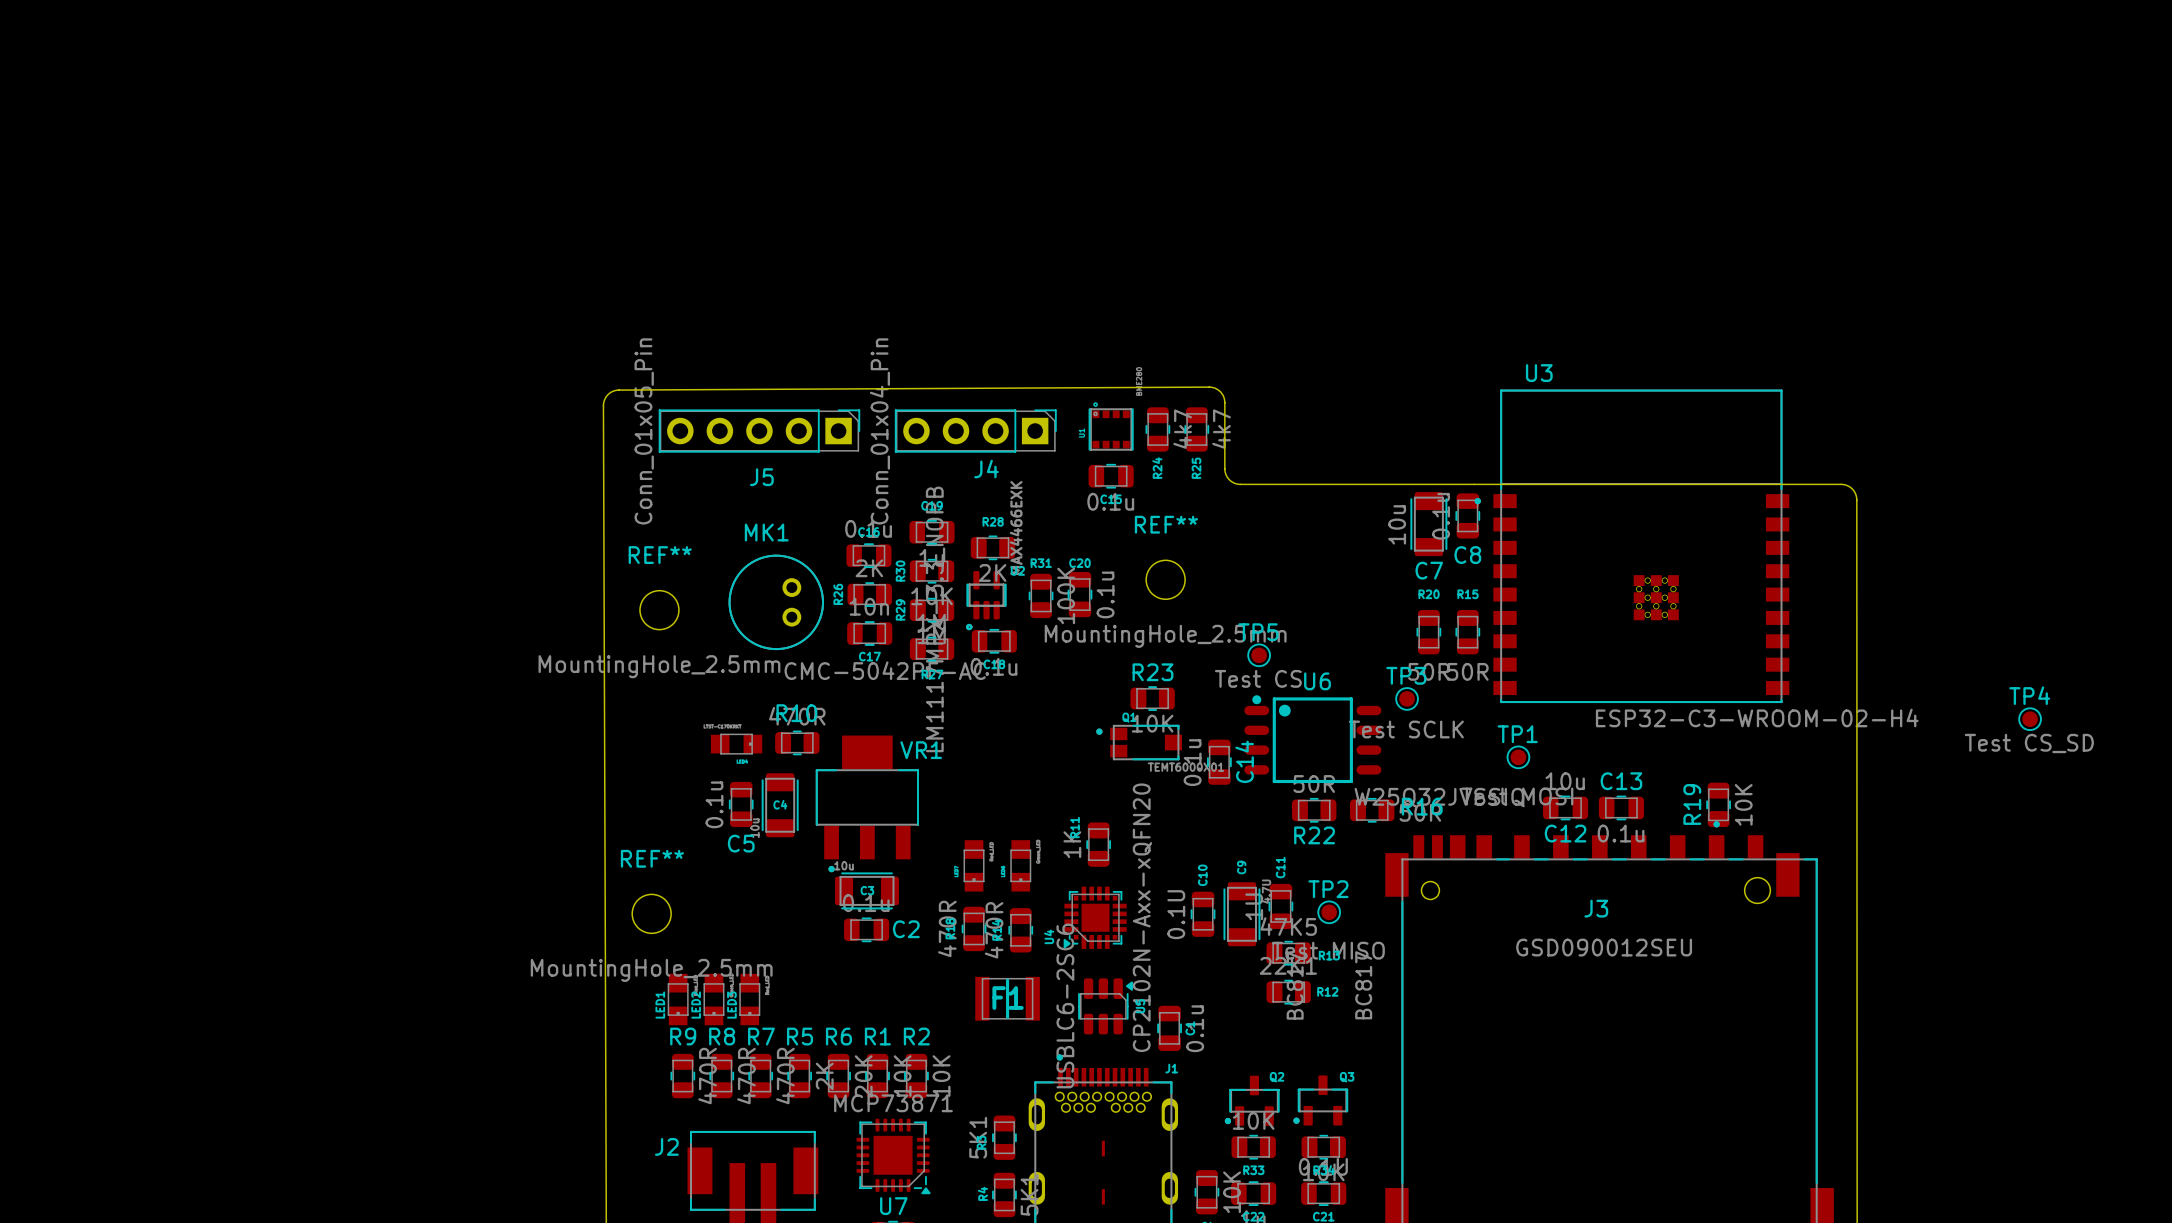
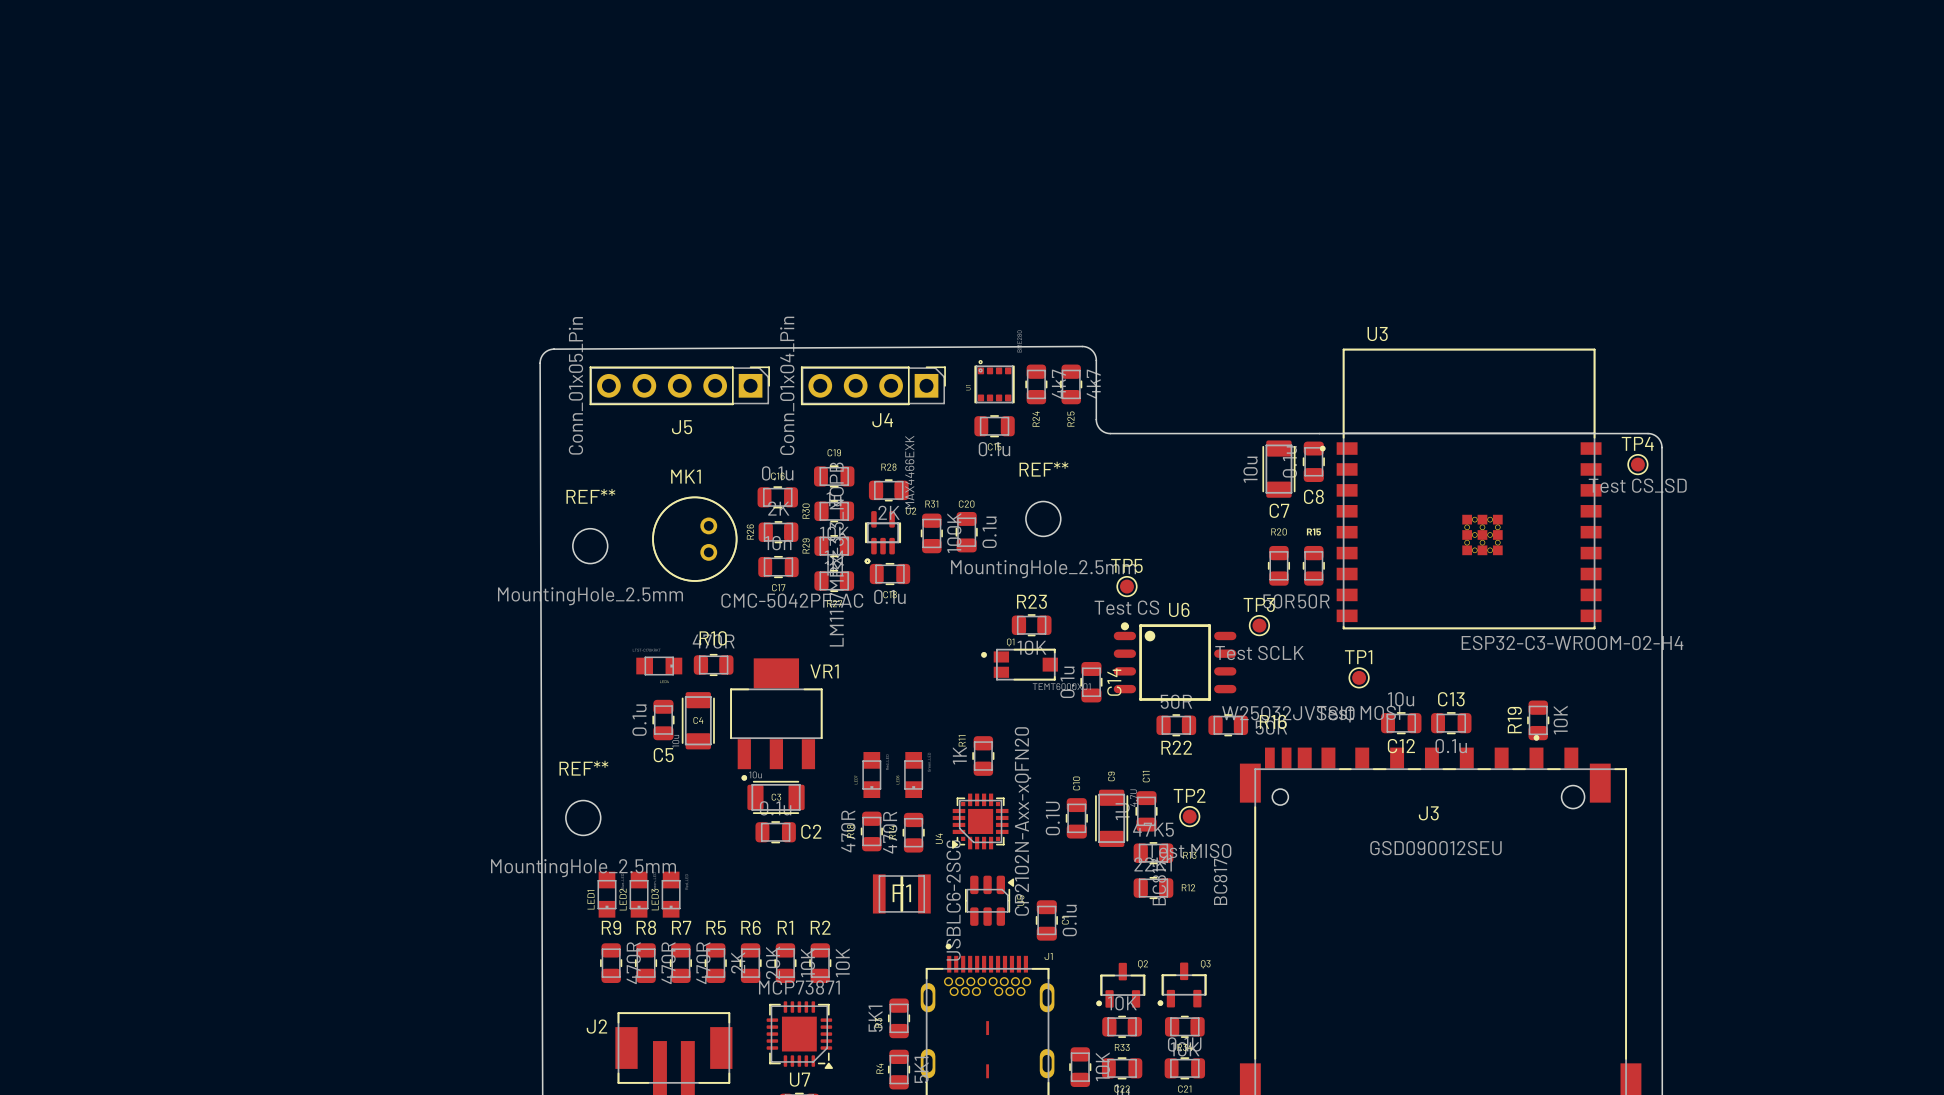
TP4 position: (2030, 719) -> (1637, 464)

